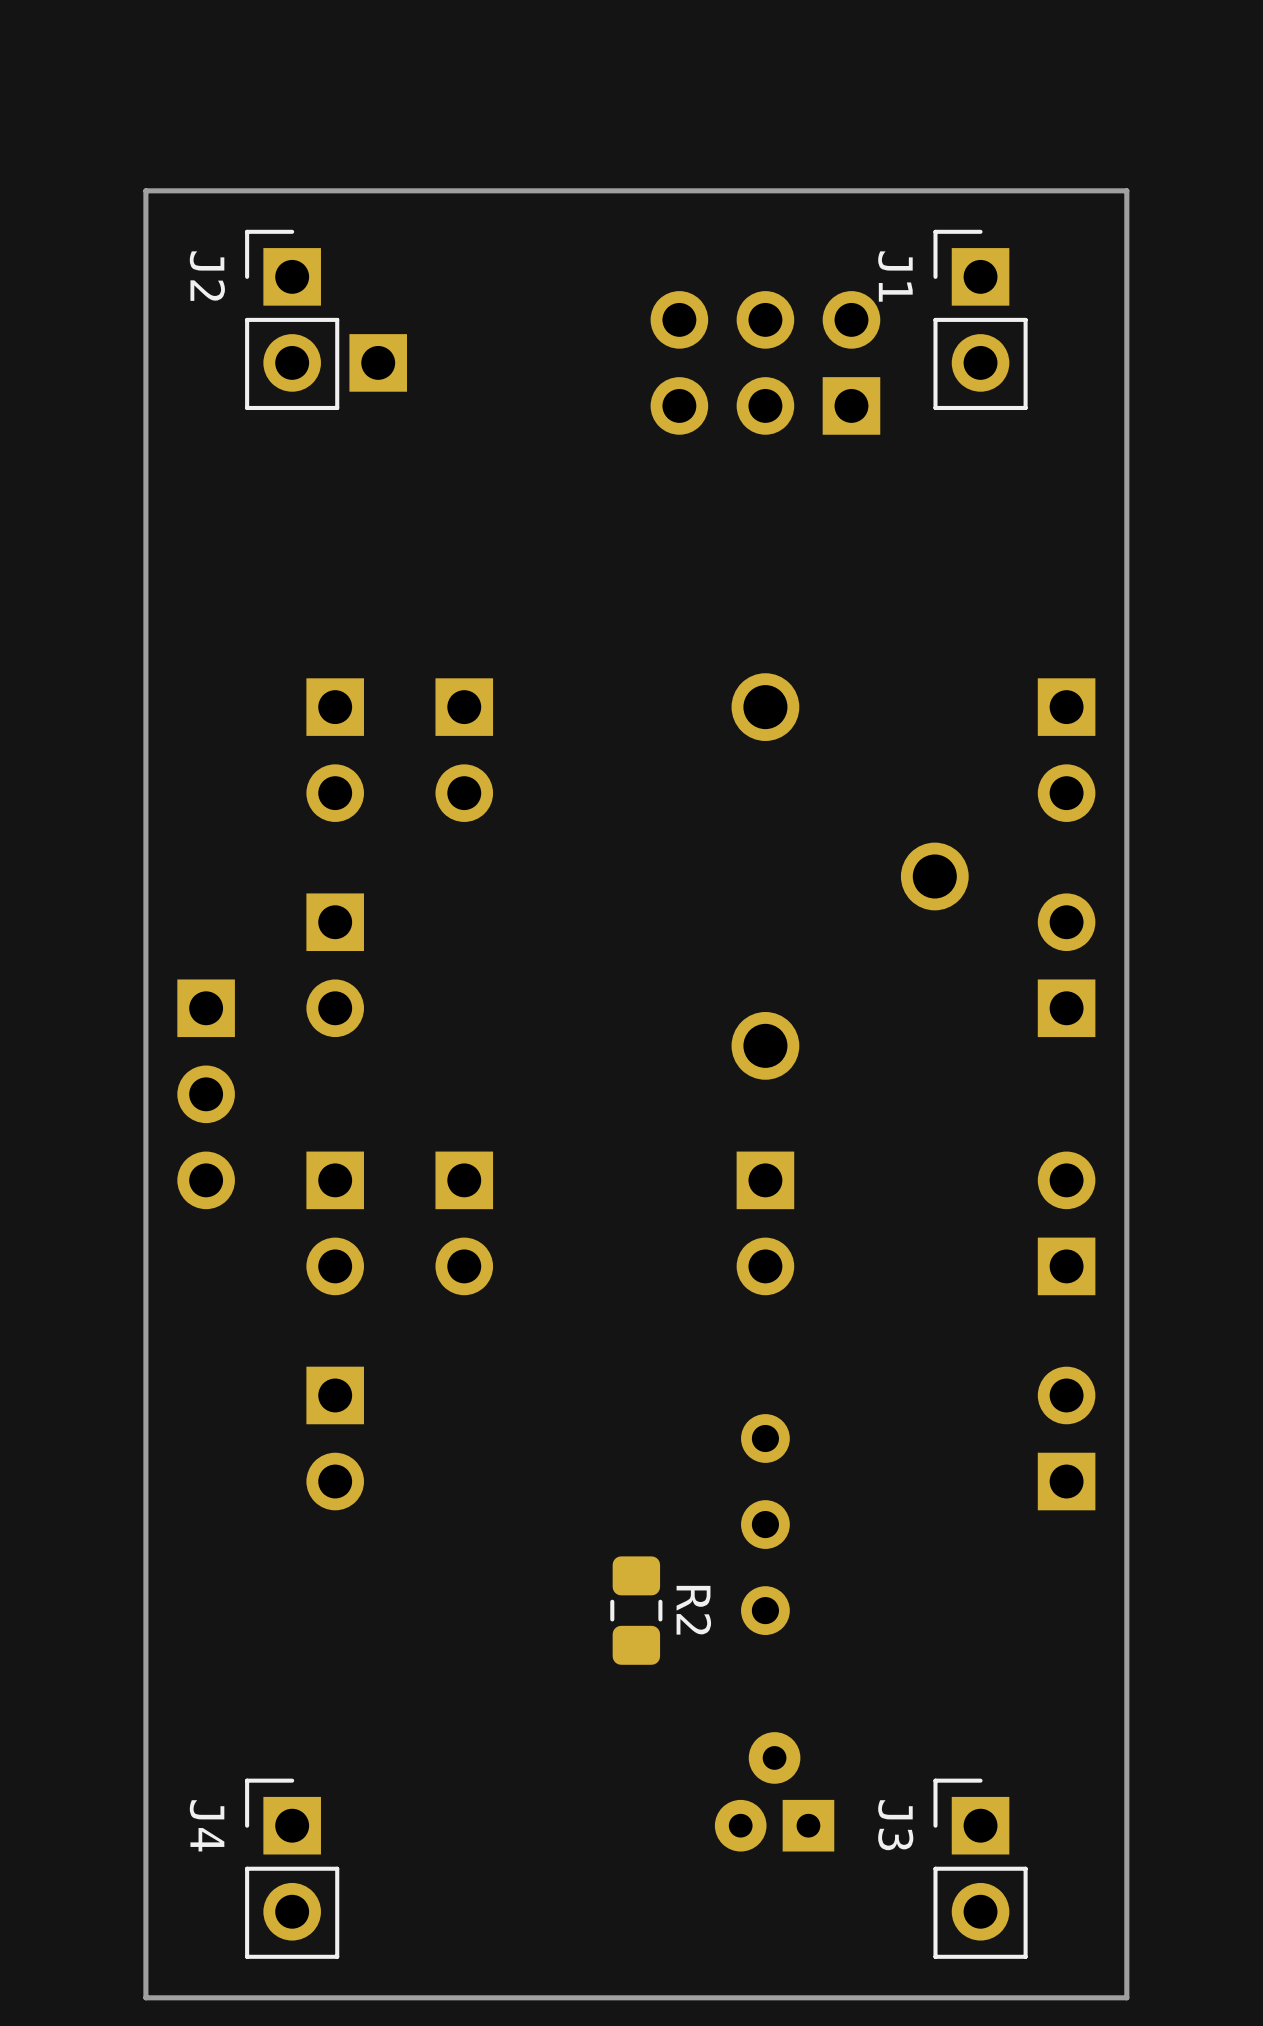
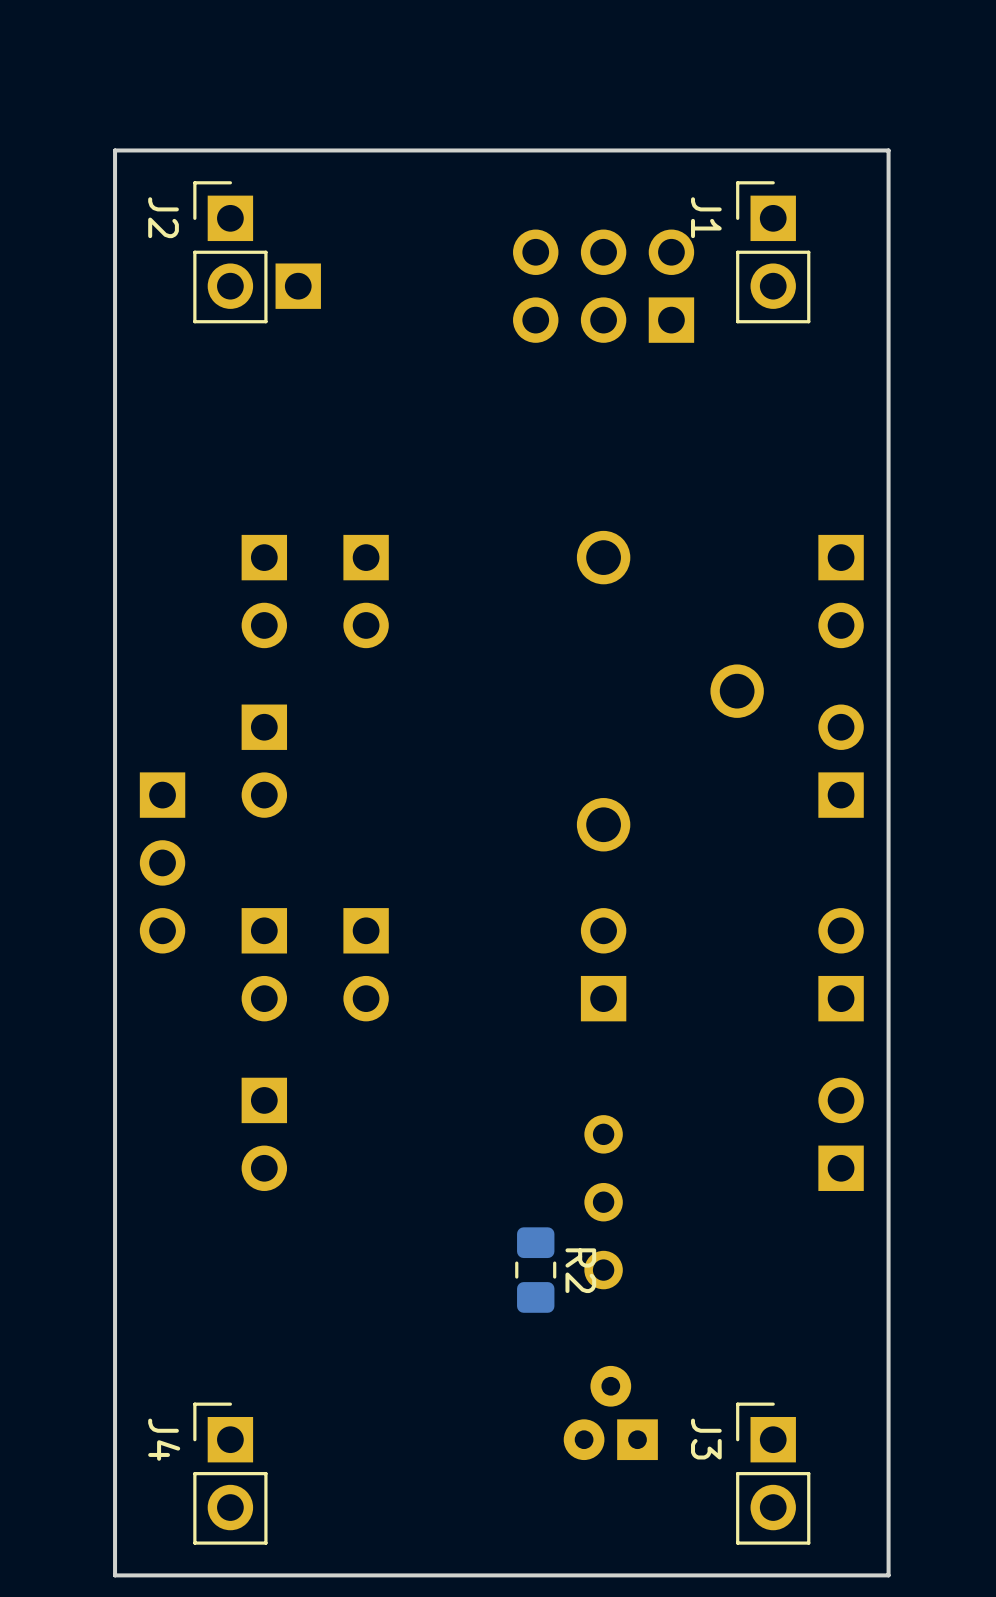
part rotation: 0° (765, 1223) -> 180° (603, 964)
R2 position: (636, 1610) -> (535, 1270)

